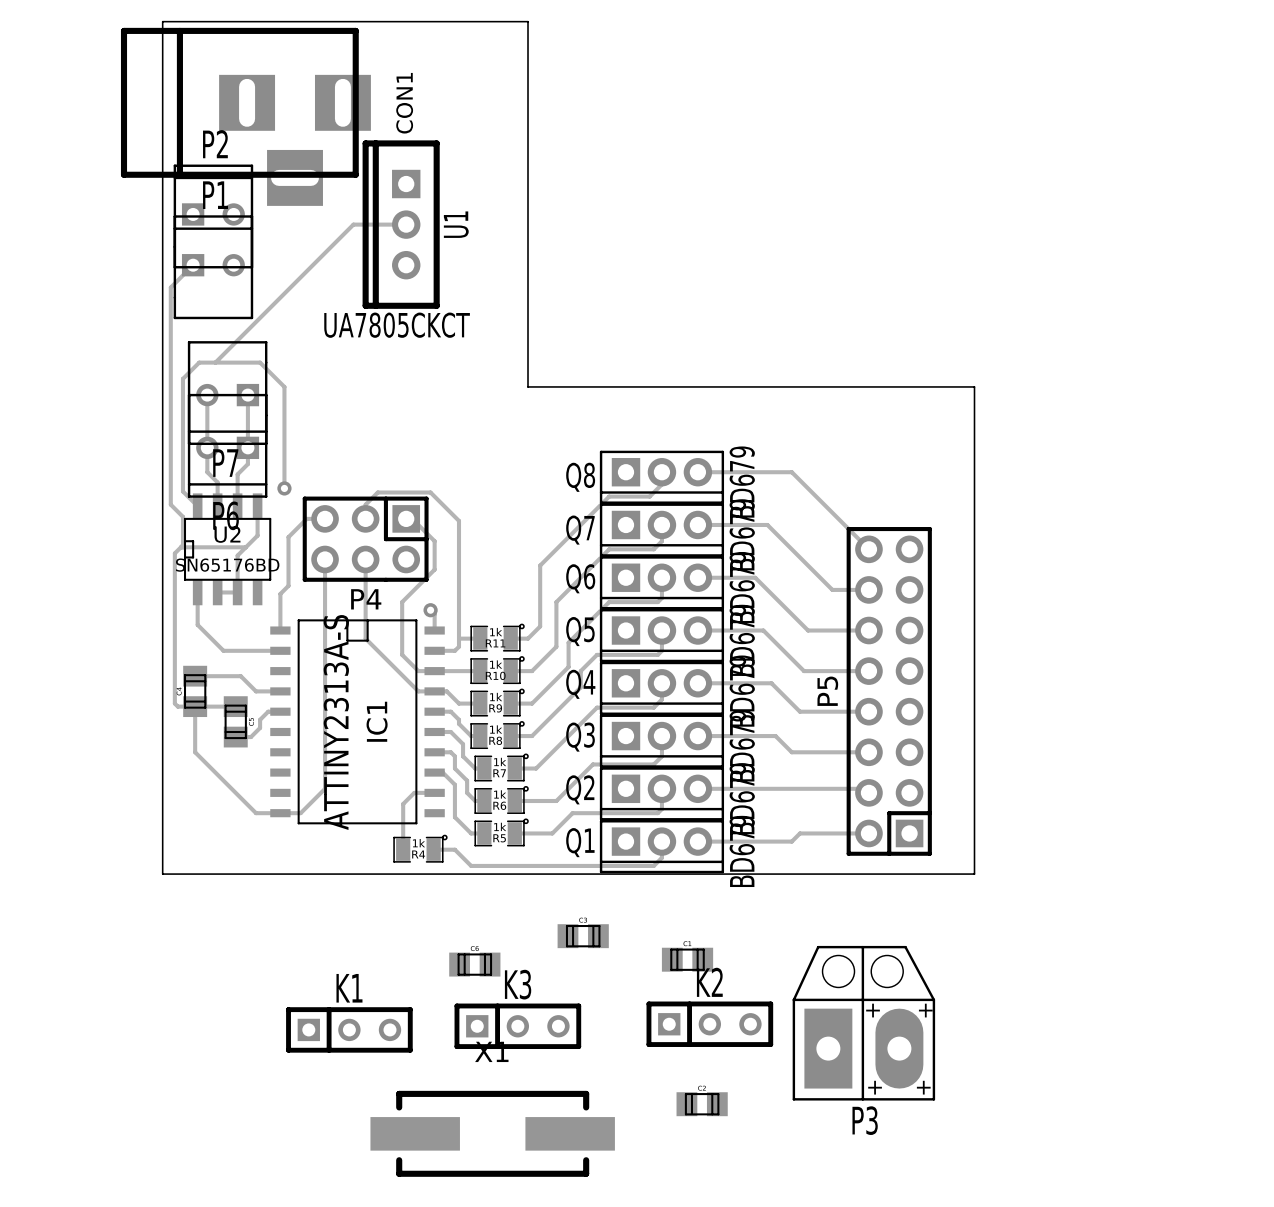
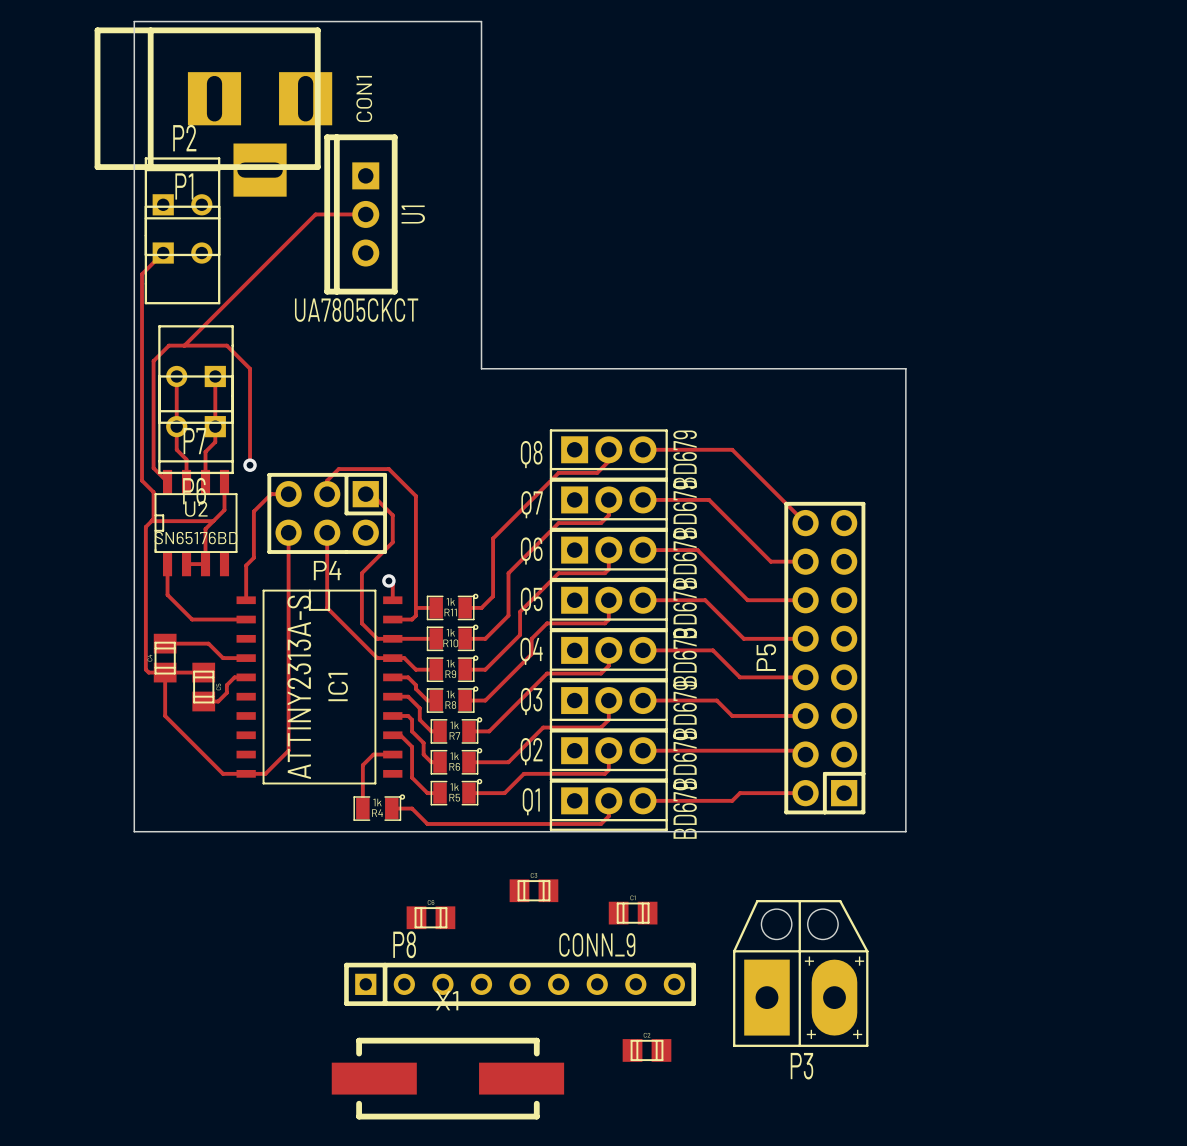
K2: (709, 1024) -> none
K3: (517, 1026) -> none
K1: (349, 1029) -> none
P8: none -> CONN_9 (520, 984)

